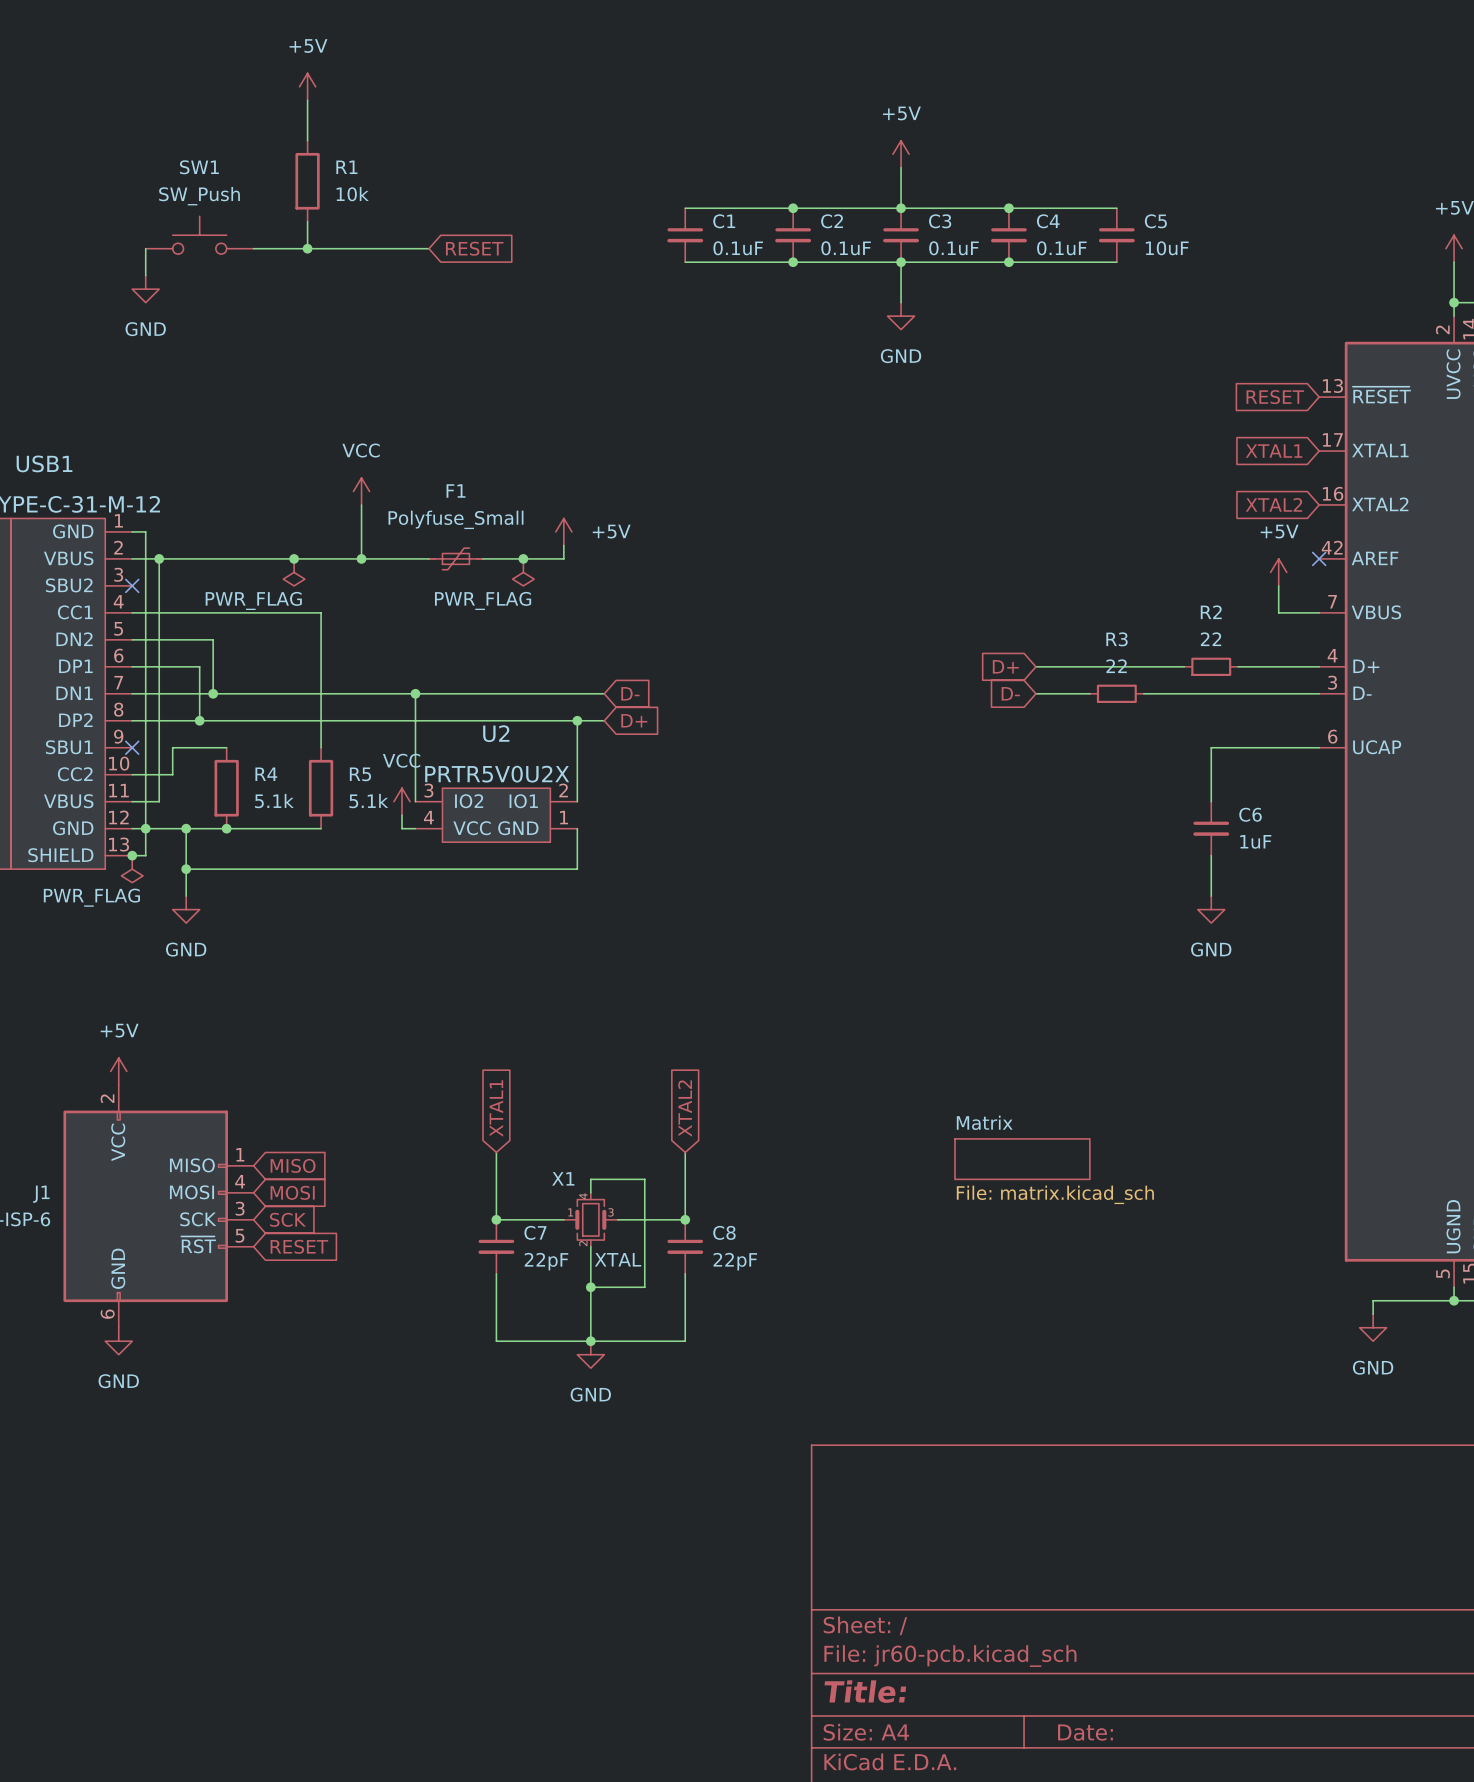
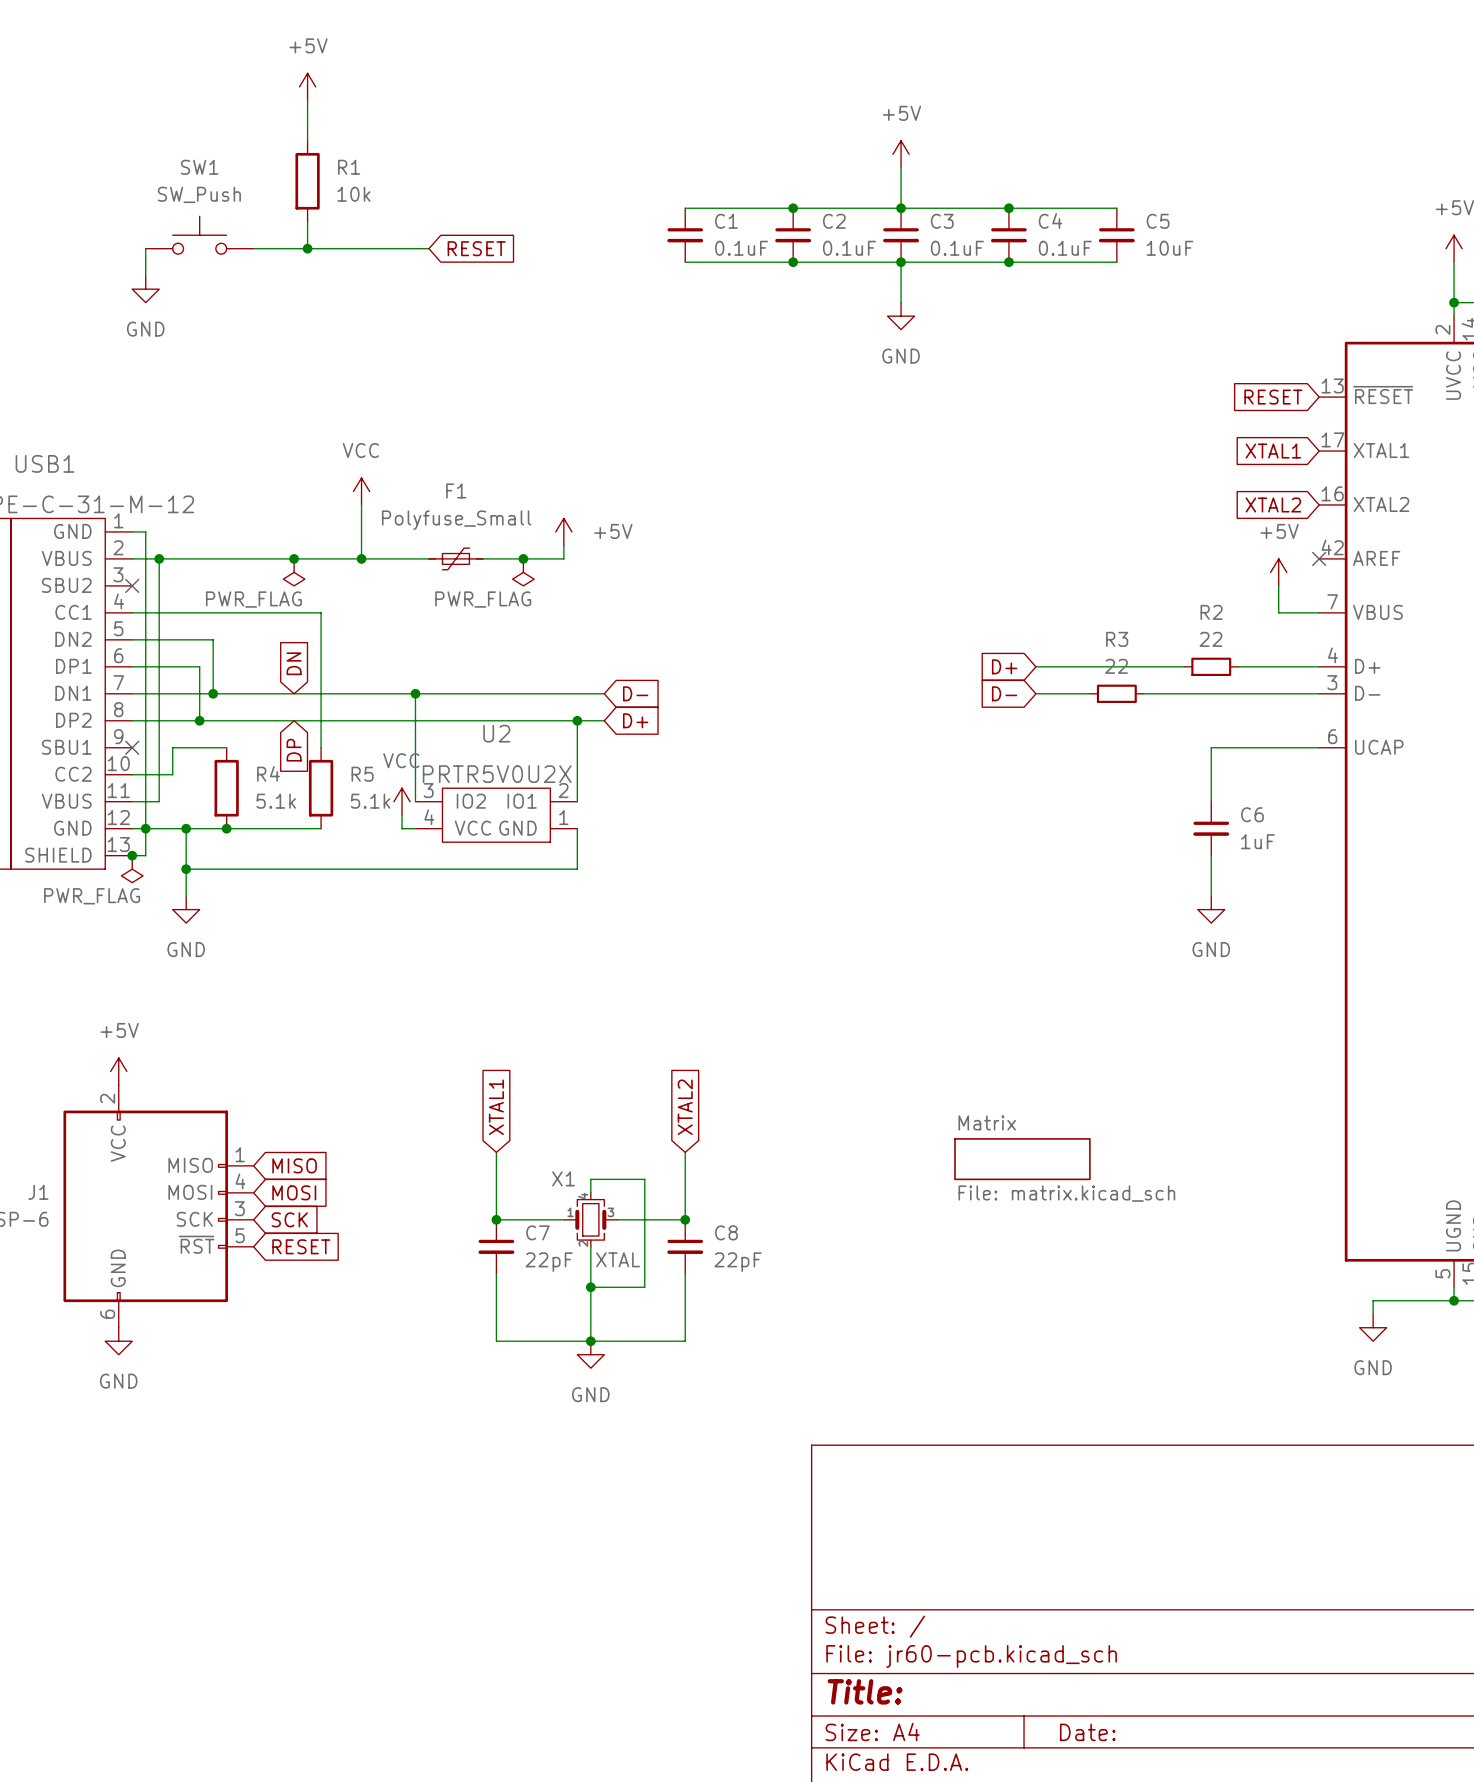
global label: none -> DN (294, 663)
global label: none -> DP (294, 750)

